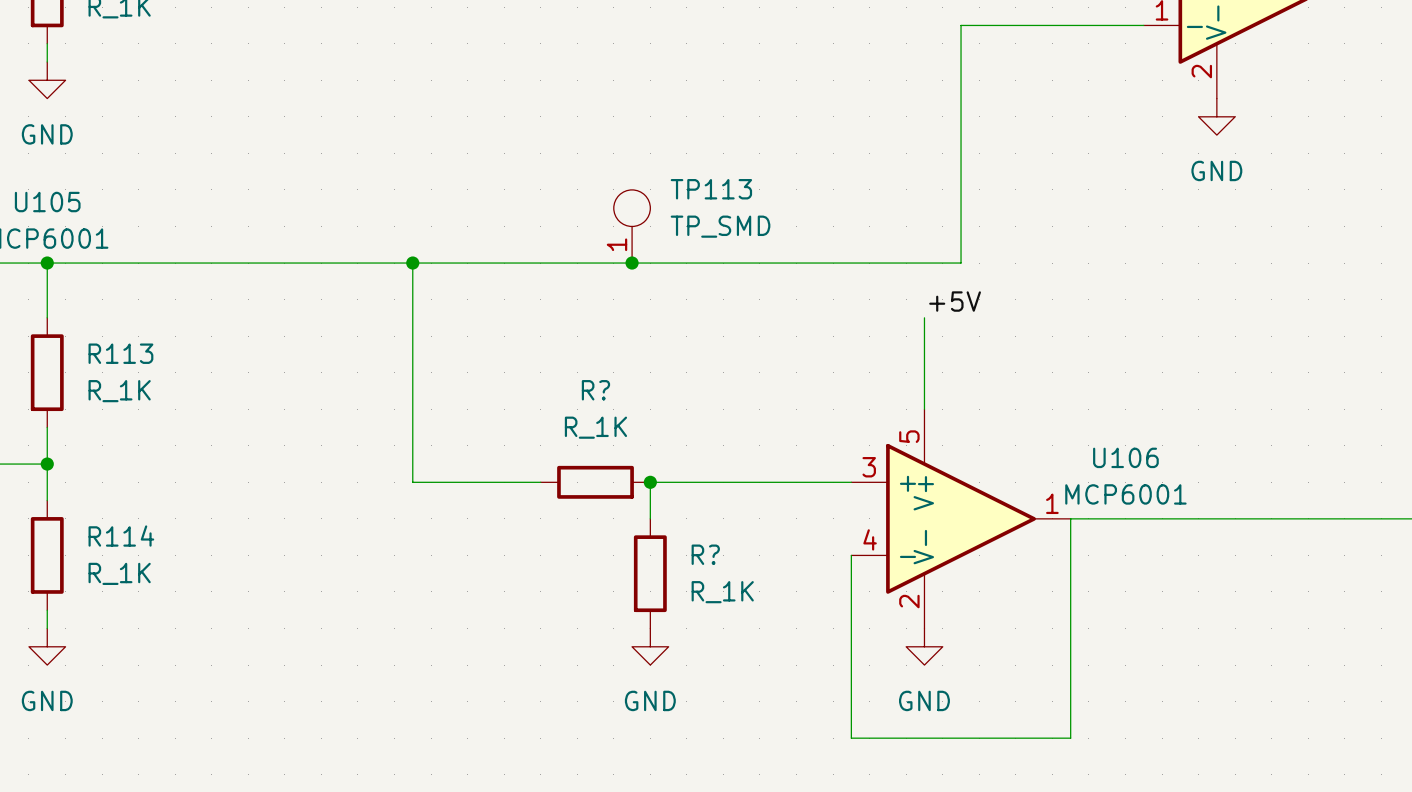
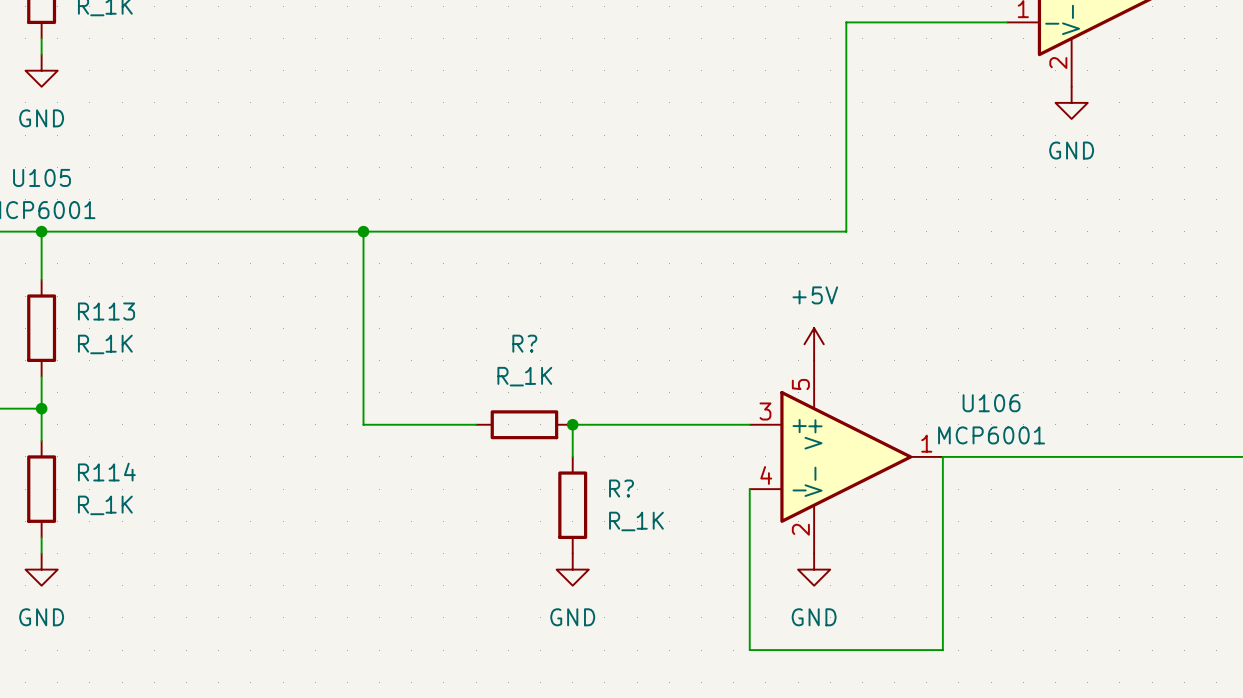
TP113: TP_SMD (632, 226) -> none
junction: (632, 263) -> none
label: +5V (955, 301) -> none
wire: (924, 317) (924, 409) -> none
power symbol: none -> +5V (814, 344)

